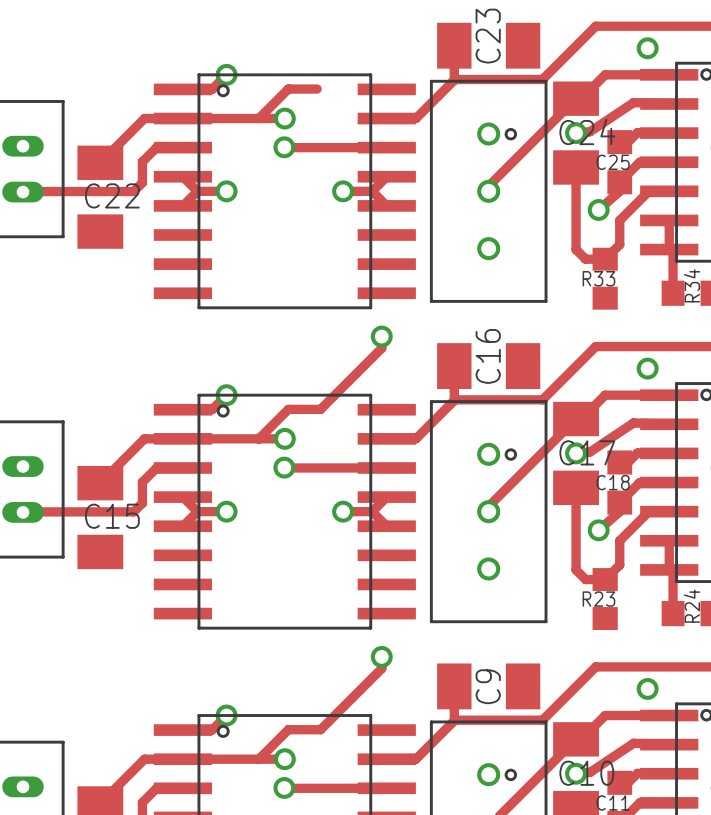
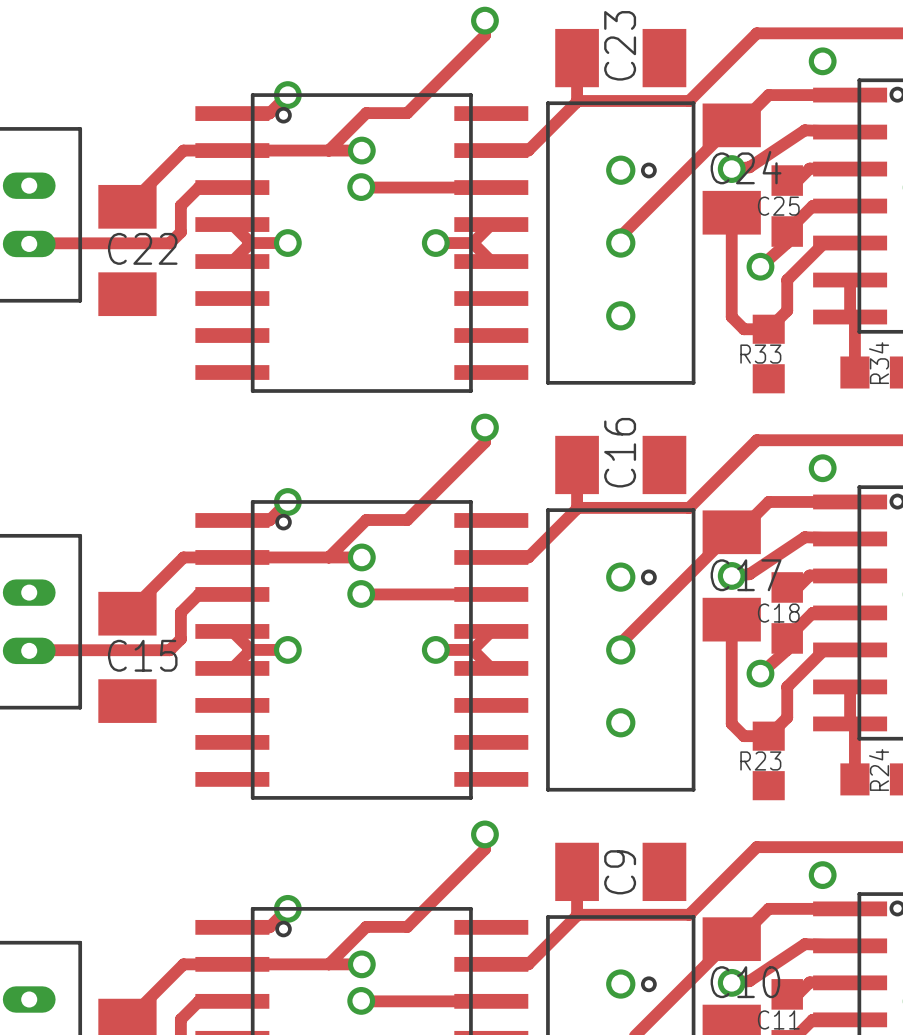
track: none -> (484, 20) (484, 35) (407, 113) (402, 113)
via: none -> (484, 20)

